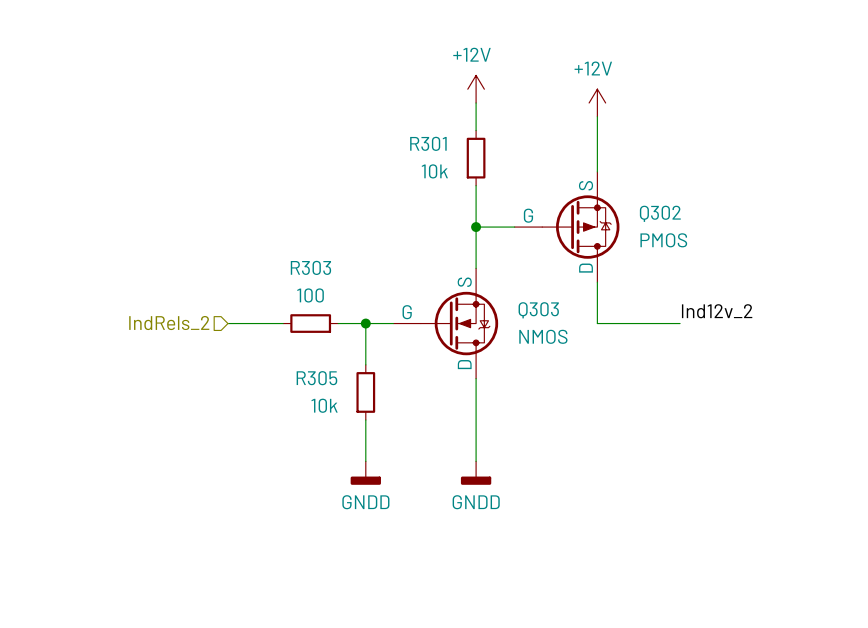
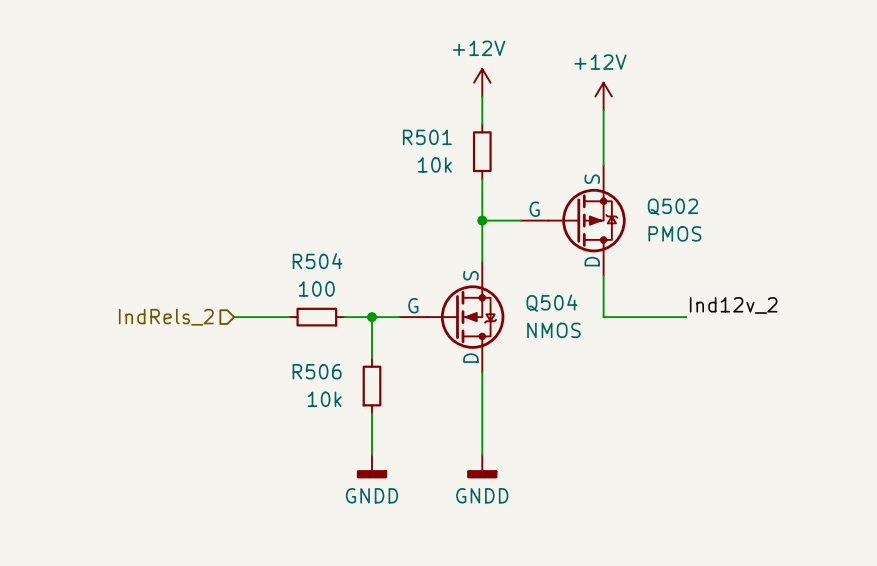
R301 name: R301 (428, 143) -> R501 (427, 137)
Q302 name: Q302 (660, 213) -> Q502 (672, 206)
R303 name: R303 (310, 267) -> R504 (317, 261)
Q303 name: Q303 (538, 310) -> Q504 (551, 303)
R305 name: R305 (316, 378) -> R506 (317, 371)

